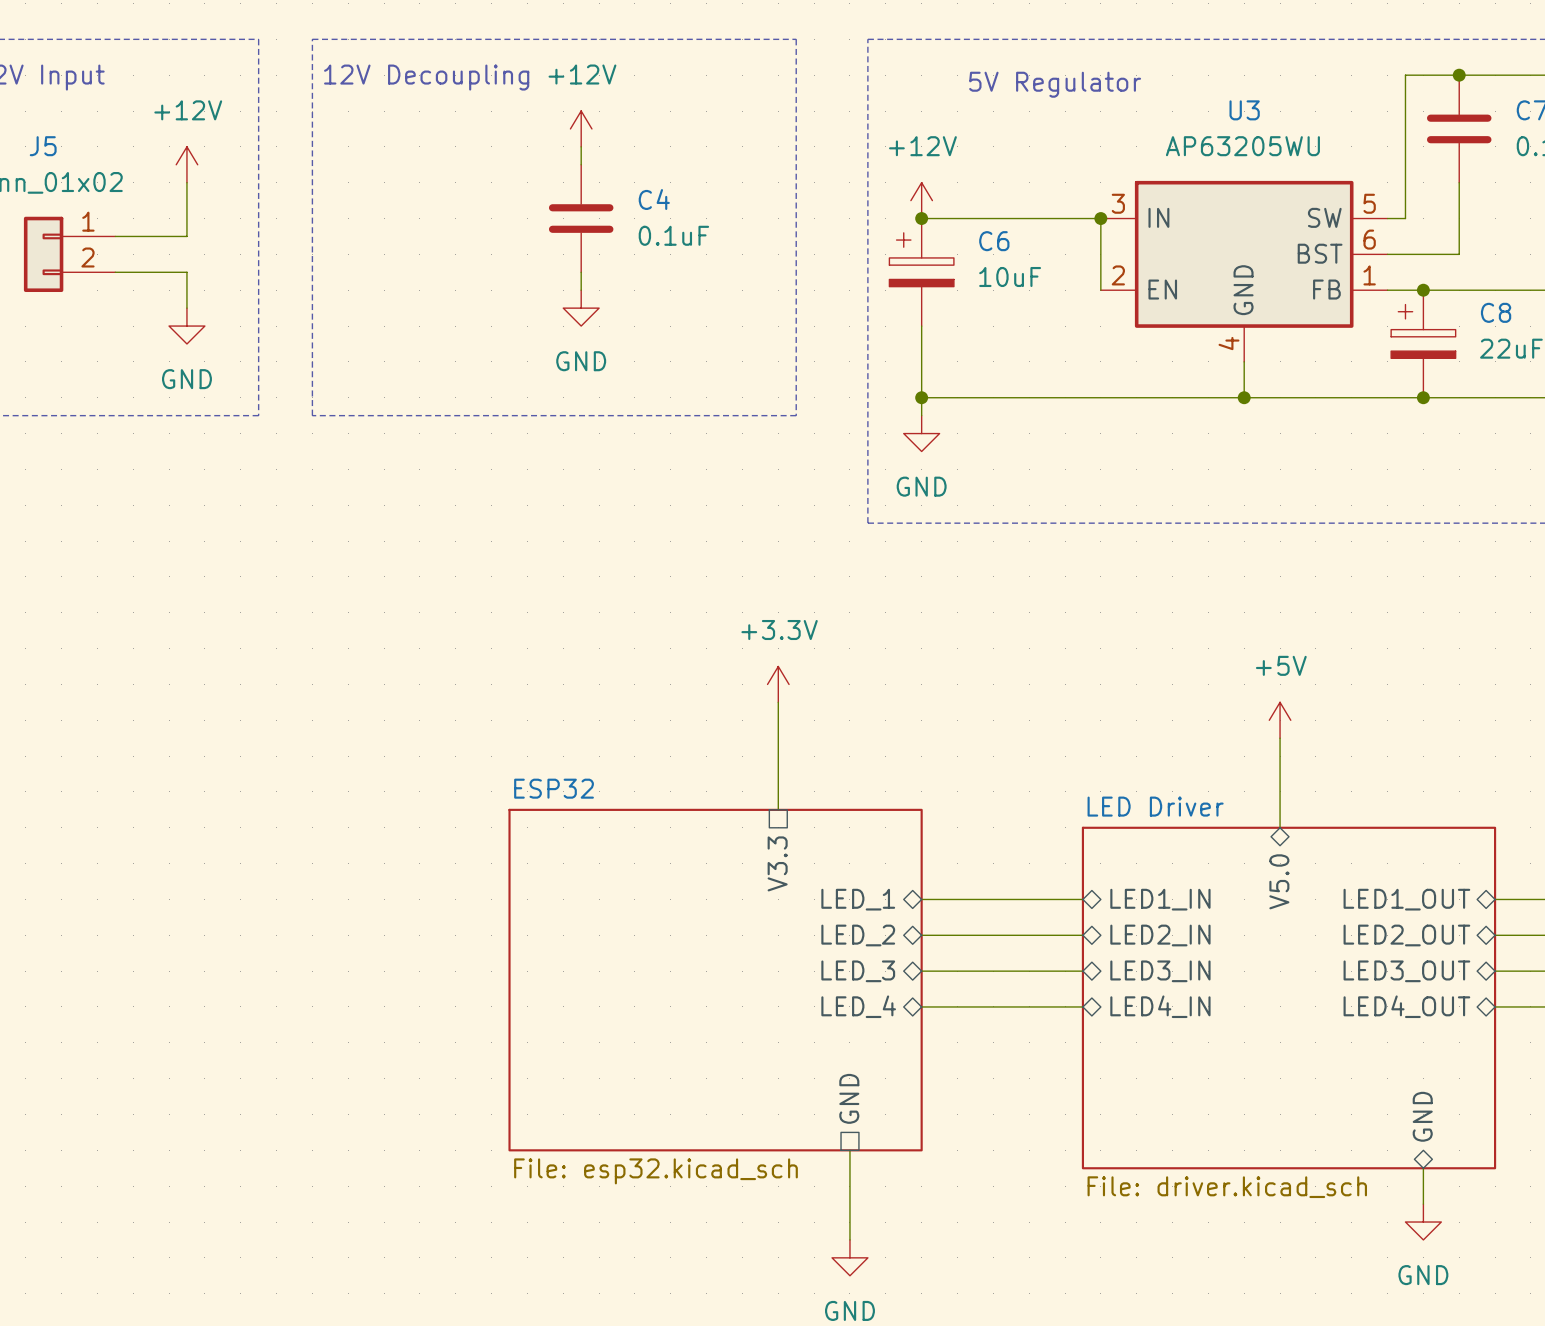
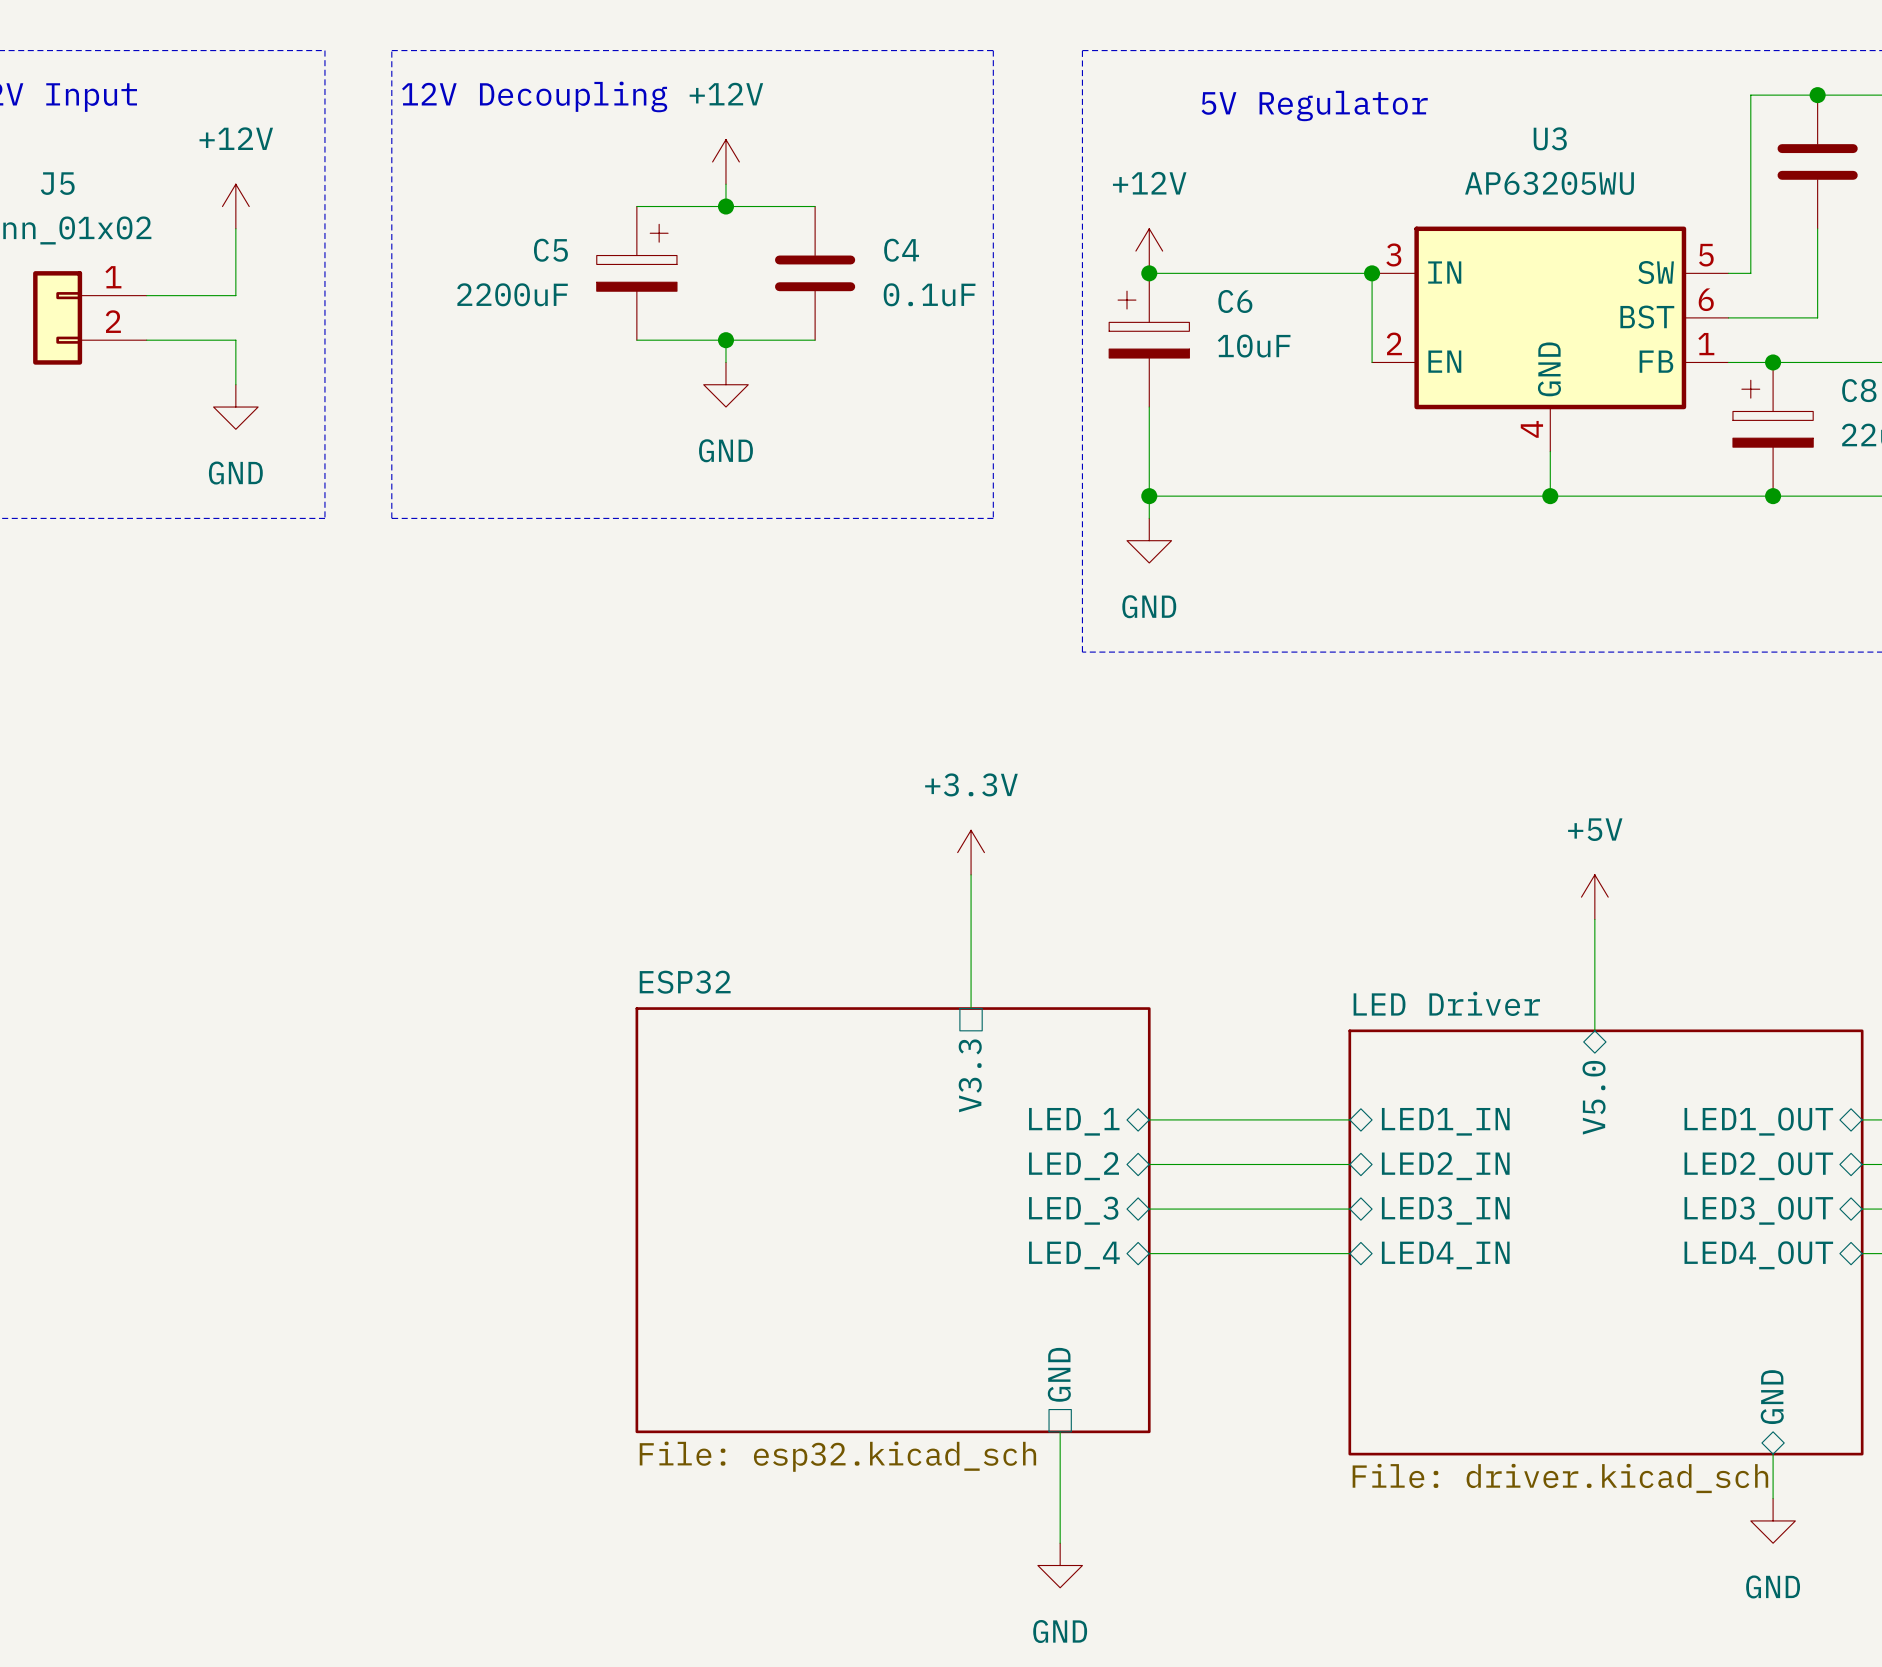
wire: none -> (636, 206) (815, 206)
junction: none -> (725, 206)
C5: none -> 2200uF (636, 273)
C4 position: (581, 218) -> (815, 273)
wire: none -> (636, 340) (815, 340)
junction: none -> (725, 340)

